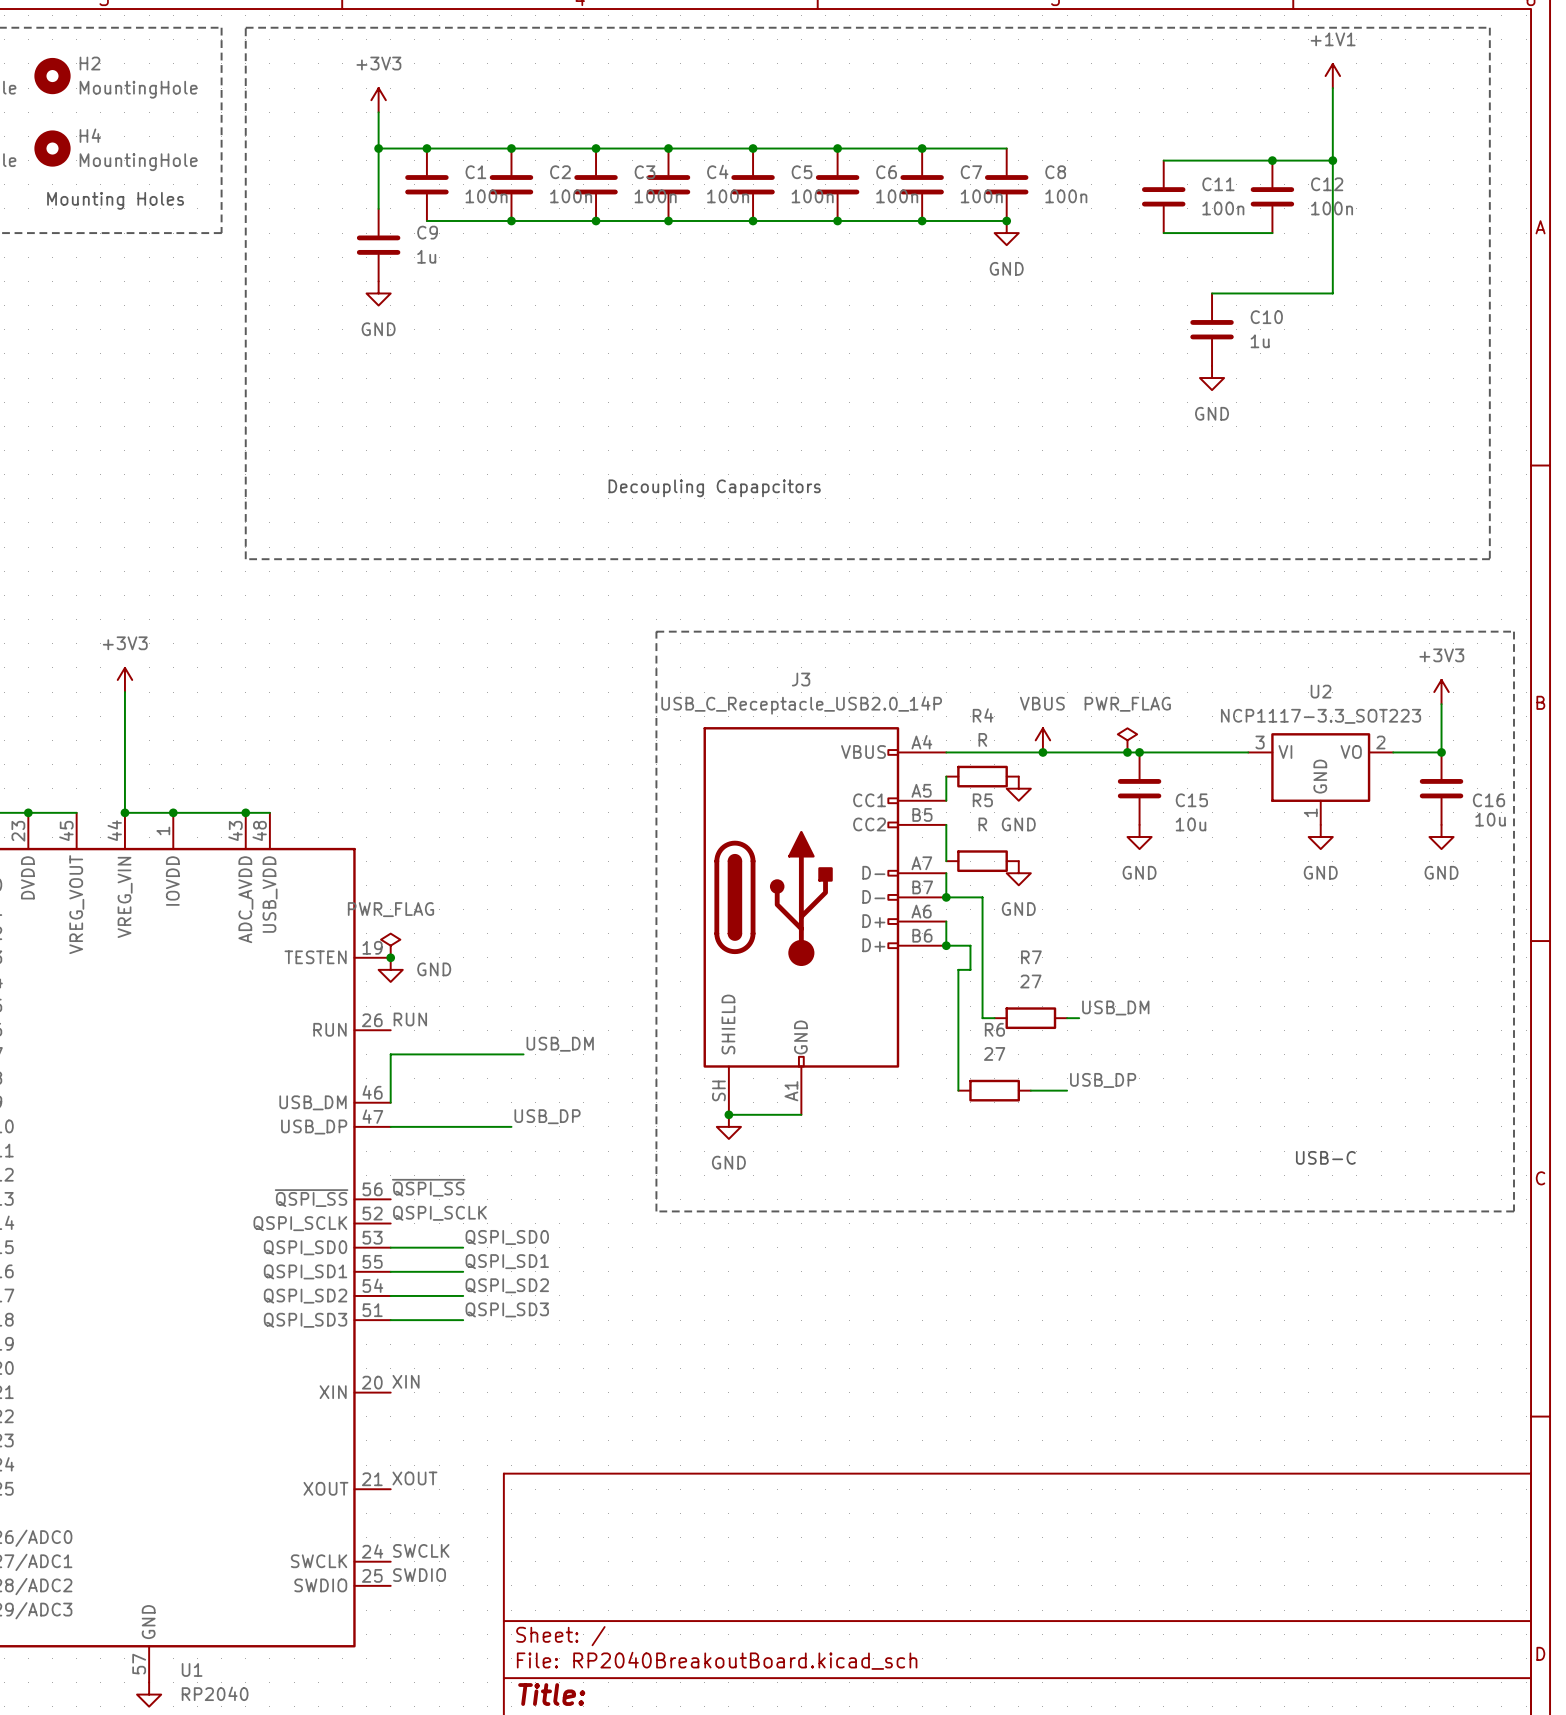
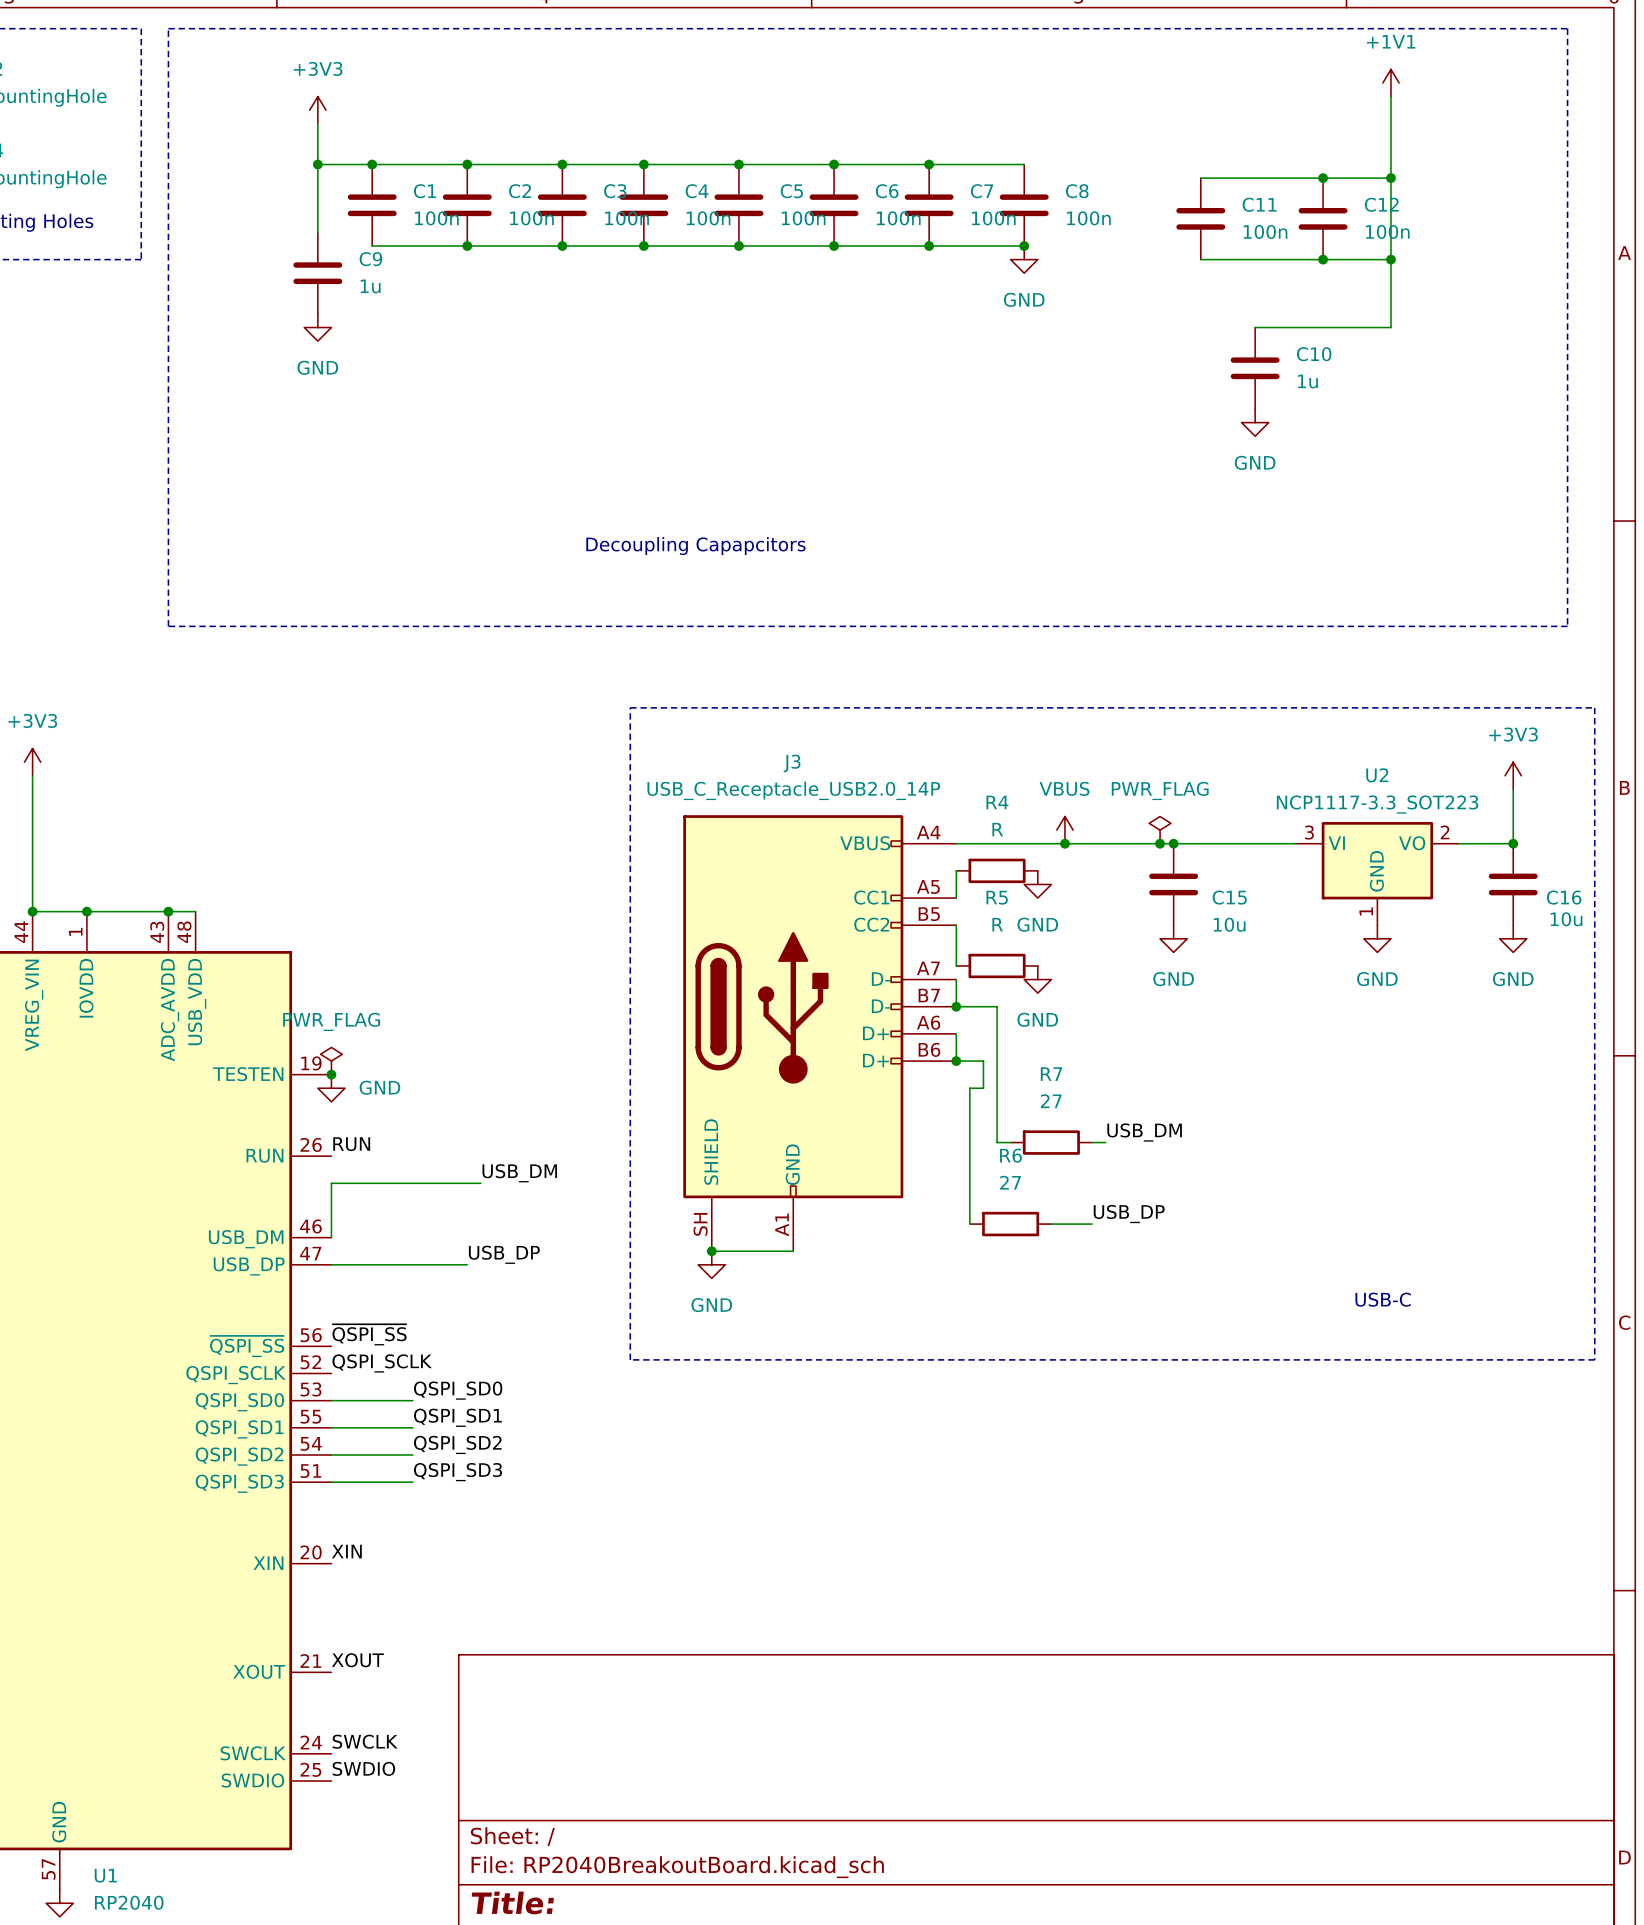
wire: none -> (1323, 259) (1390, 259)
junction: none -> (1323, 259)
junction: none -> (1390, 259)

